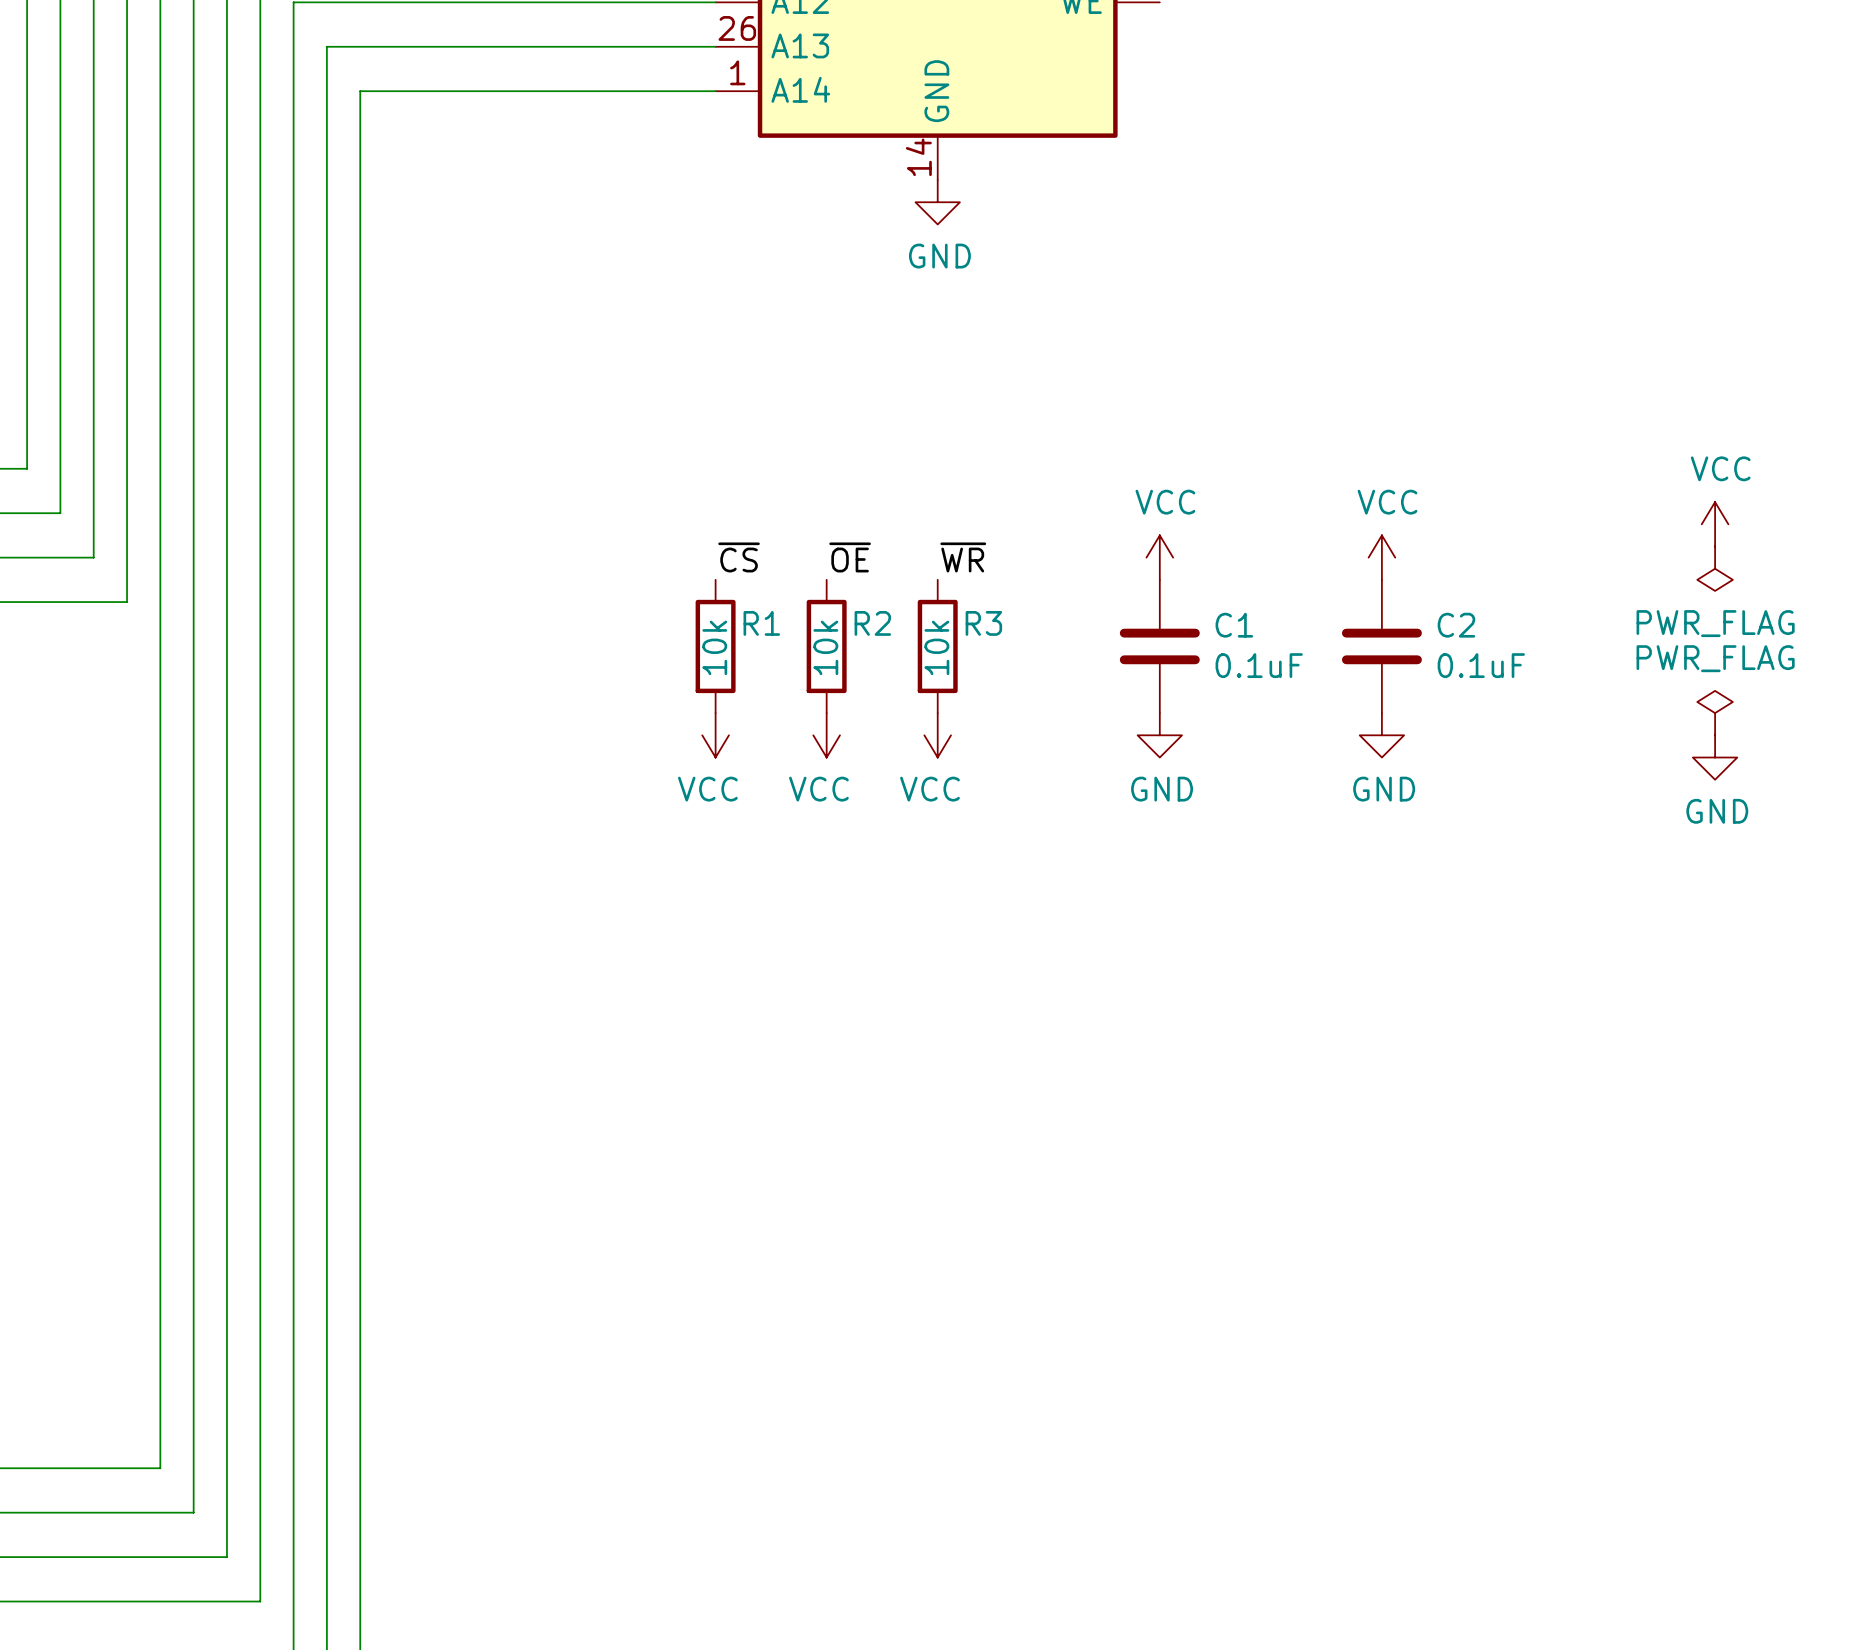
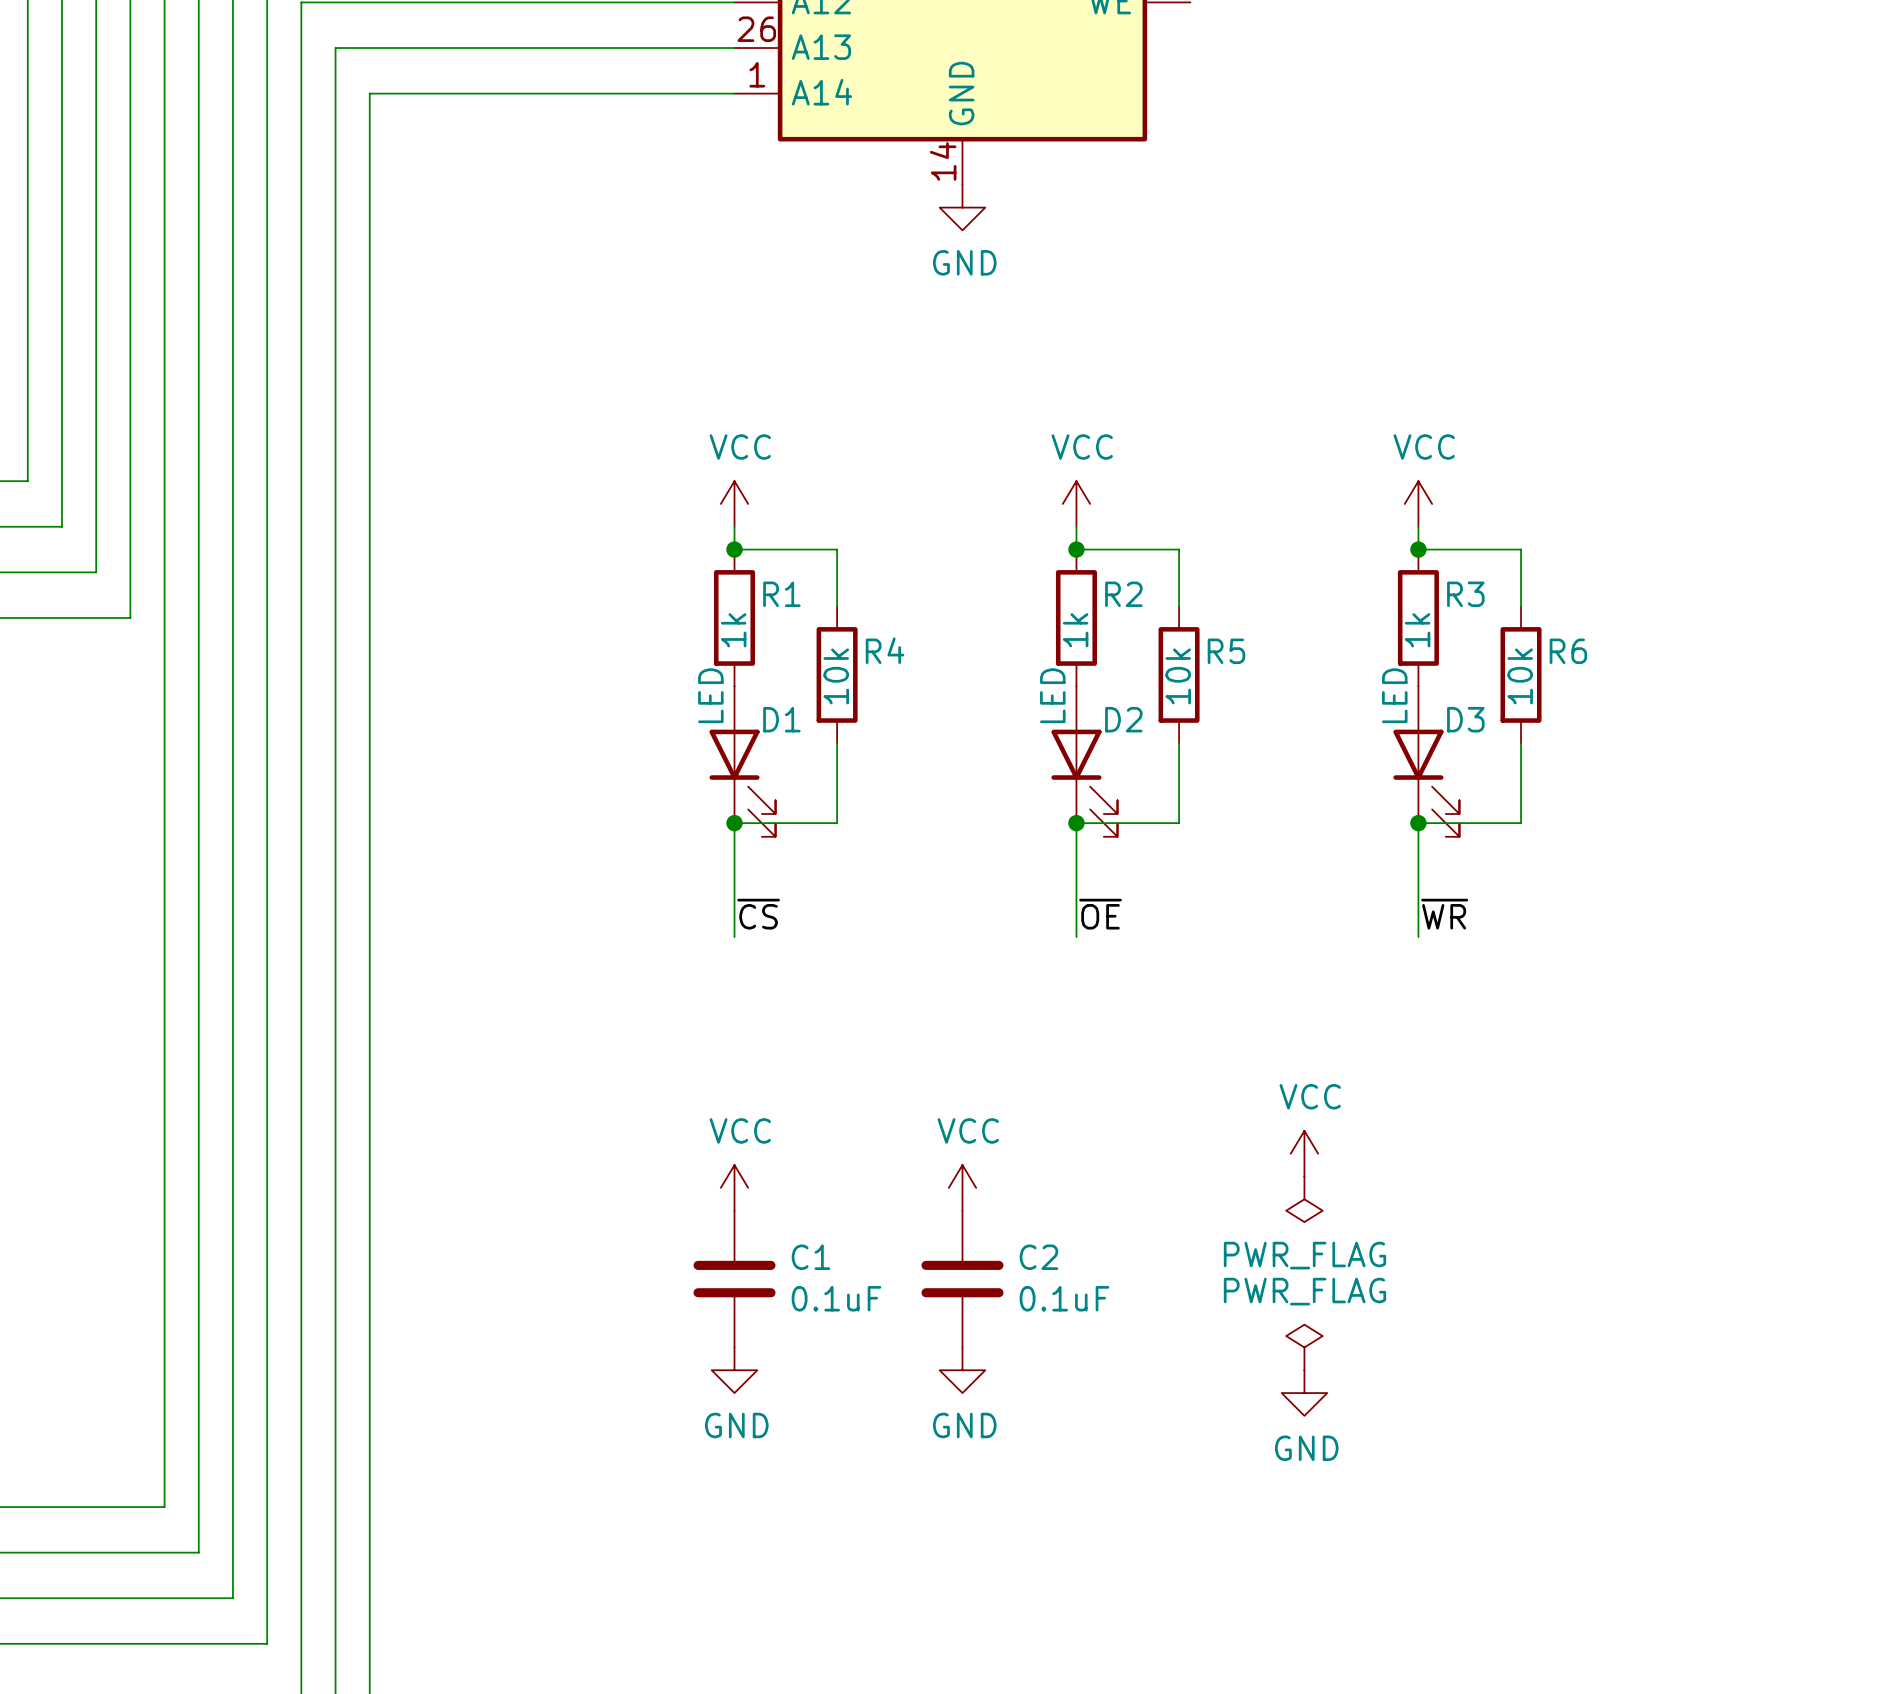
power symbol: none -> VCC (734, 503)
power symbol: none -> VCC (1076, 503)
wire: none -> (734, 526) (734, 549) (837, 549) (837, 606)
wire: none -> (1076, 526) (1076, 549) (1179, 549) (1179, 606)
wire: none -> (1418, 526) (1418, 549) (1521, 549) (1521, 606)
power symbol: VCC (1715, 524) -> none
junction: none -> (734, 549)
junction: none -> (1076, 549)
junction: none -> (1418, 549)
label position: ~{CS} (739, 557) -> ~{CS} (758, 914)
label position: ~{OE} (850, 557) -> ~{OE} (1100, 914)
label: ~{WR} (963, 557) -> none
power symbol: VCC (1159, 557) -> none
power symbol position: VCC (1381, 557) -> VCC (1418, 503)
power symbol: PWR_FLAG (1715, 568) -> none
R1 position: (715, 646) -> (734, 617)
R2 position: (826, 646) -> (1076, 617)
R3 position: (937, 646) -> (1418, 617)
C1 position: (1159, 646) -> (734, 1279)
C2 position: (1381, 646) -> (962, 1279)
R1 value: 10k (714, 647) -> 1k (733, 630)
R2 value: 10k (825, 647) -> 1k (1075, 630)
R3 value: 10k (936, 647) -> 1k (1417, 630)
R4: none -> 10k (837, 674)
R5: none -> 10k (1179, 674)
R6: none -> 10k (1521, 674)
power symbol: PWR_FLAG (1715, 713) -> none
wire: none -> (837, 743) (837, 823) (734, 823) (734, 937)
wire: none -> (1179, 743) (1179, 823) (1076, 823) (1076, 937)
wire: none -> (1521, 743) (1521, 823) (1418, 823) (1418, 937)
power symbol: VCC (715, 735) -> none
power symbol: VCC (826, 735) -> none
power symbol: VCC (937, 735) -> none
power symbol: GND (1159, 735) -> none
power symbol: GND (1381, 735) -> none
D1: none -> LED (742, 761)
D2: none -> LED (1084, 761)
D3: none -> LED (1426, 761)
power symbol: GND (1715, 757) -> none
junction: none -> (734, 823)
junction: none -> (1076, 823)
junction: none -> (1418, 823)
label: none -> ~{WR} (1444, 914)
power symbol: none -> VCC (1304, 1153)
power symbol: none -> VCC (734, 1187)
power symbol: none -> VCC (962, 1187)
power symbol: none -> PWR_FLAG (1304, 1199)
power symbol: none -> PWR_FLAG (1304, 1347)
power symbol: none -> GND (734, 1370)
power symbol: none -> GND (962, 1370)
power symbol: none -> GND (1304, 1393)

